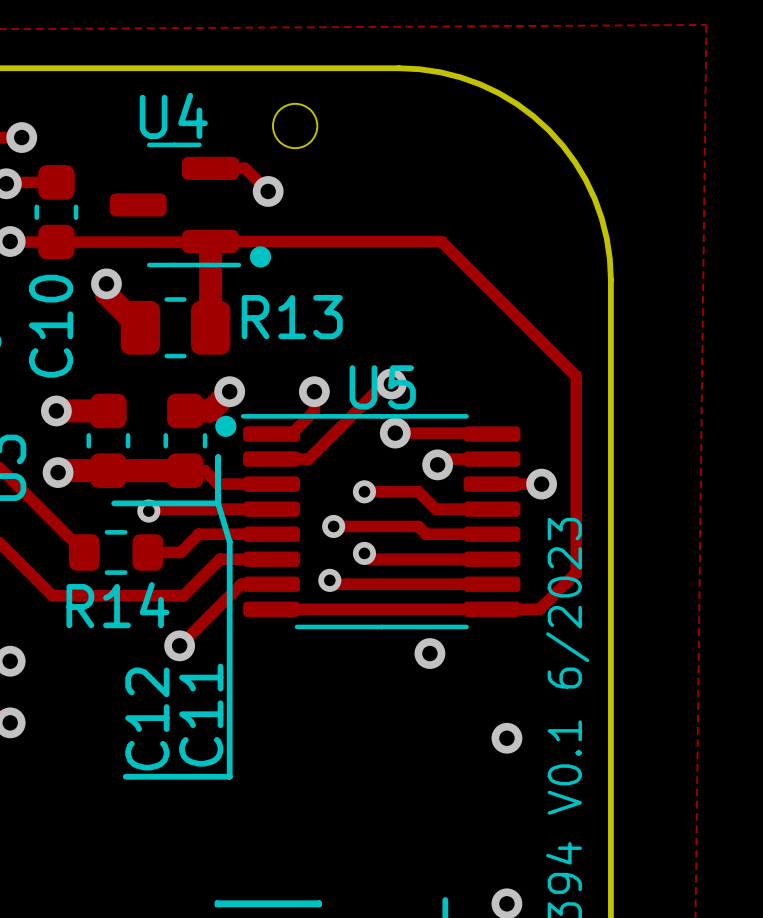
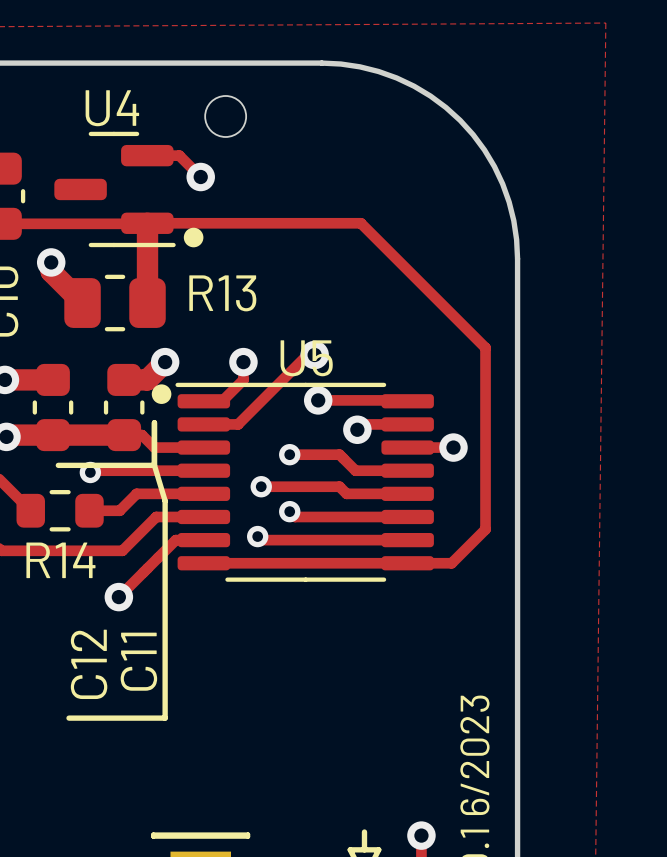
via: (429, 653) -> none
via: (506, 738) -> none

